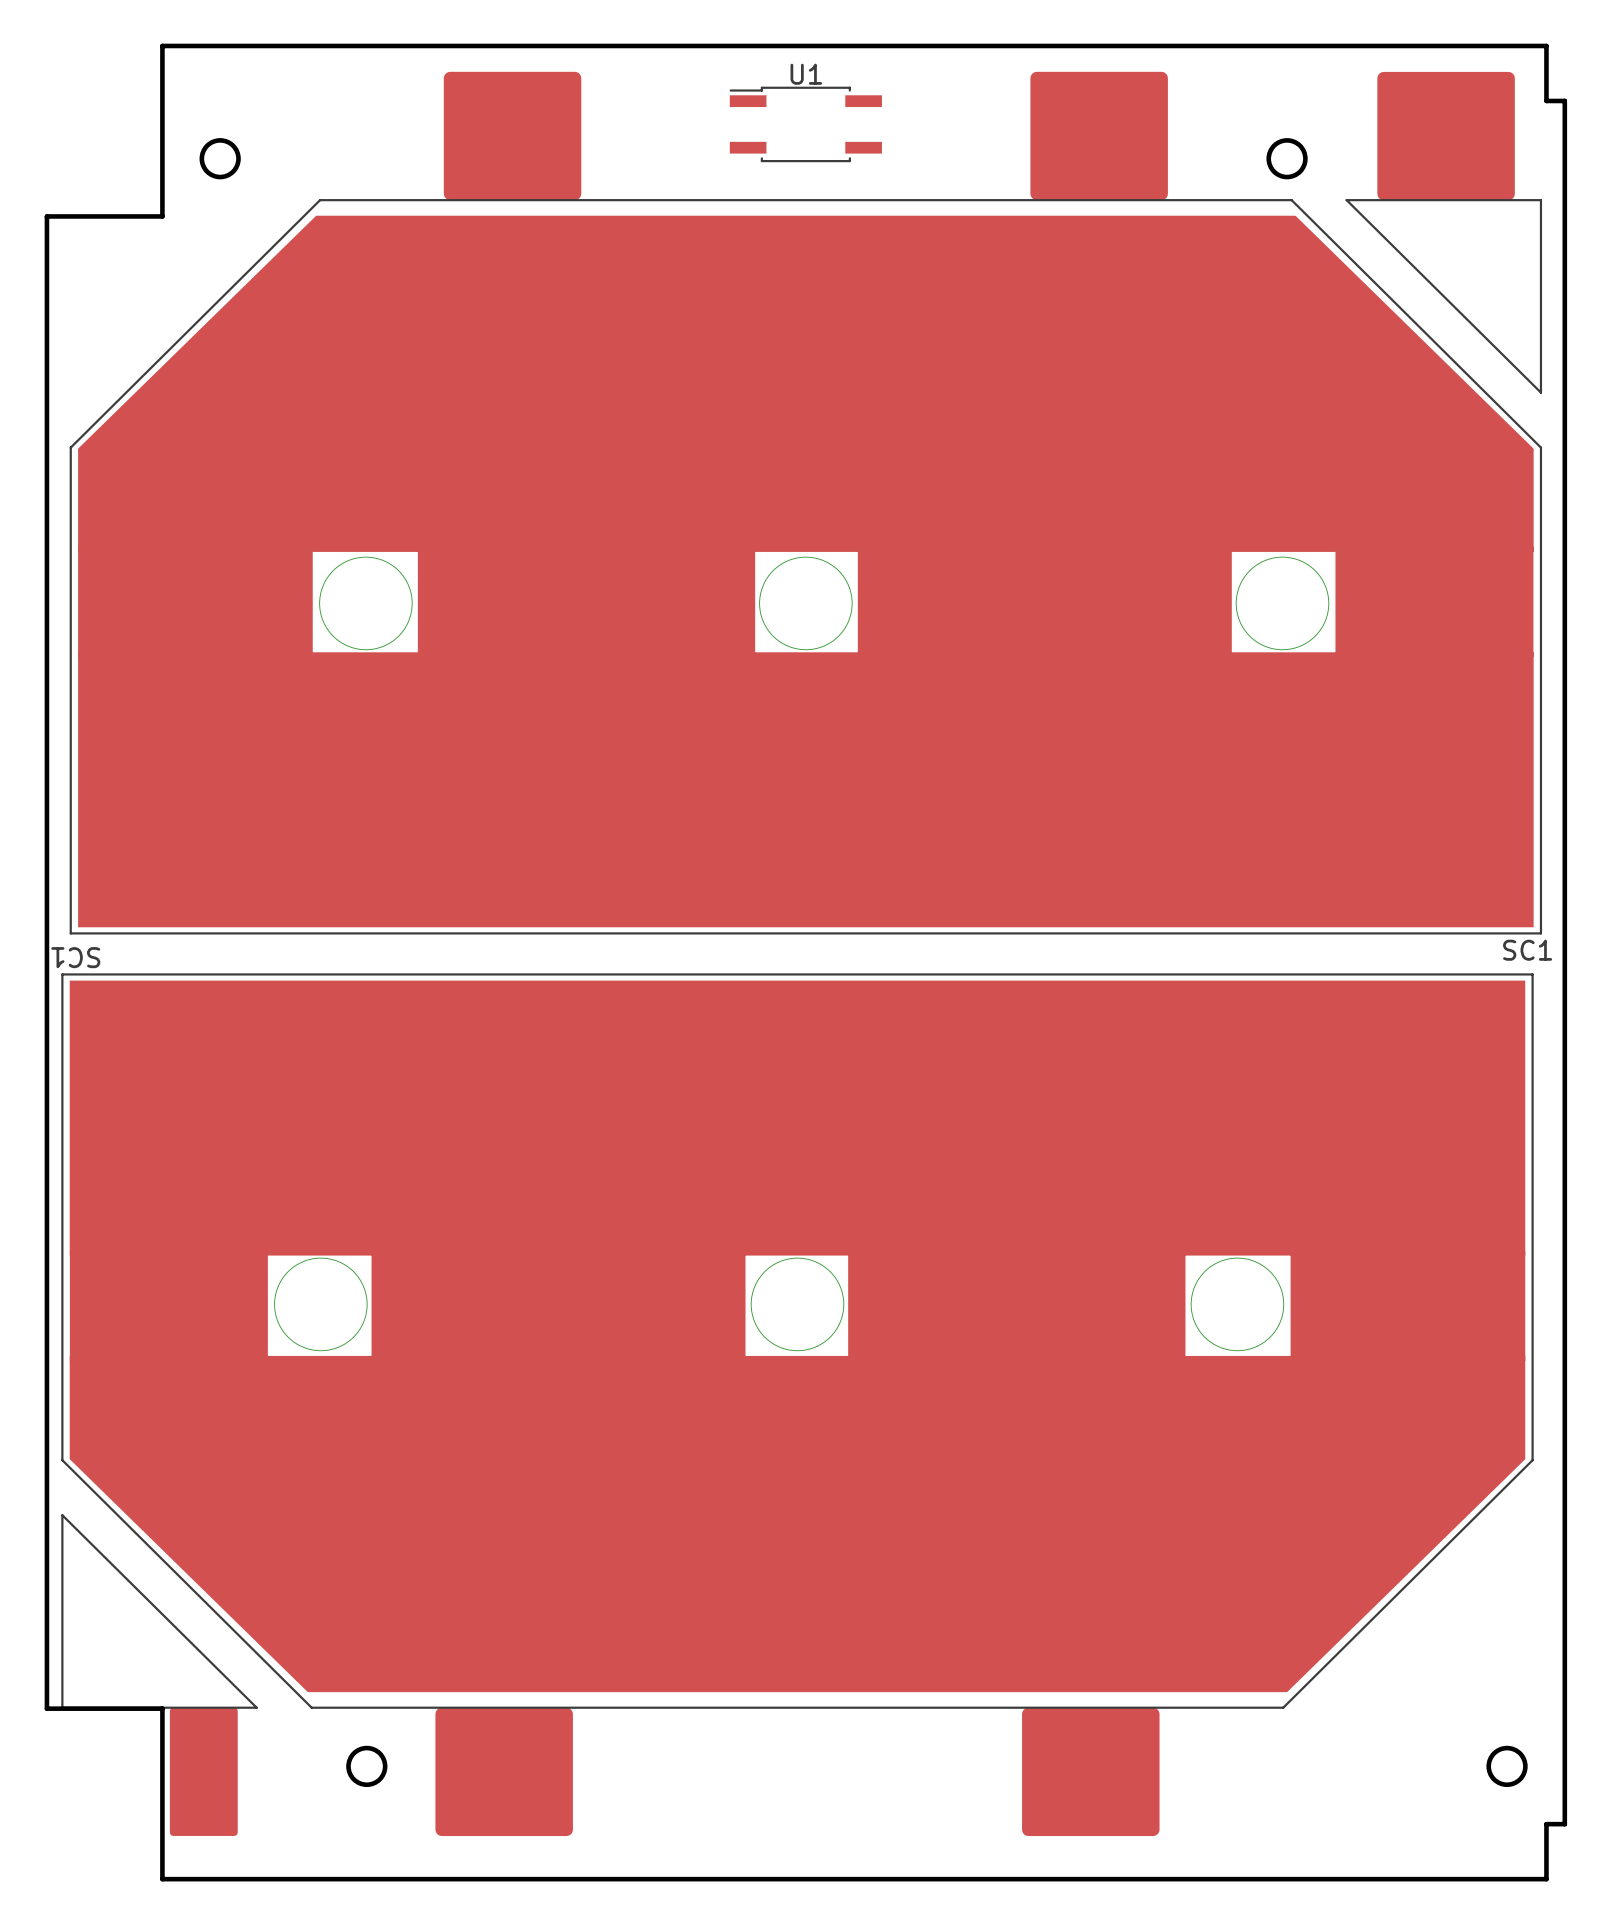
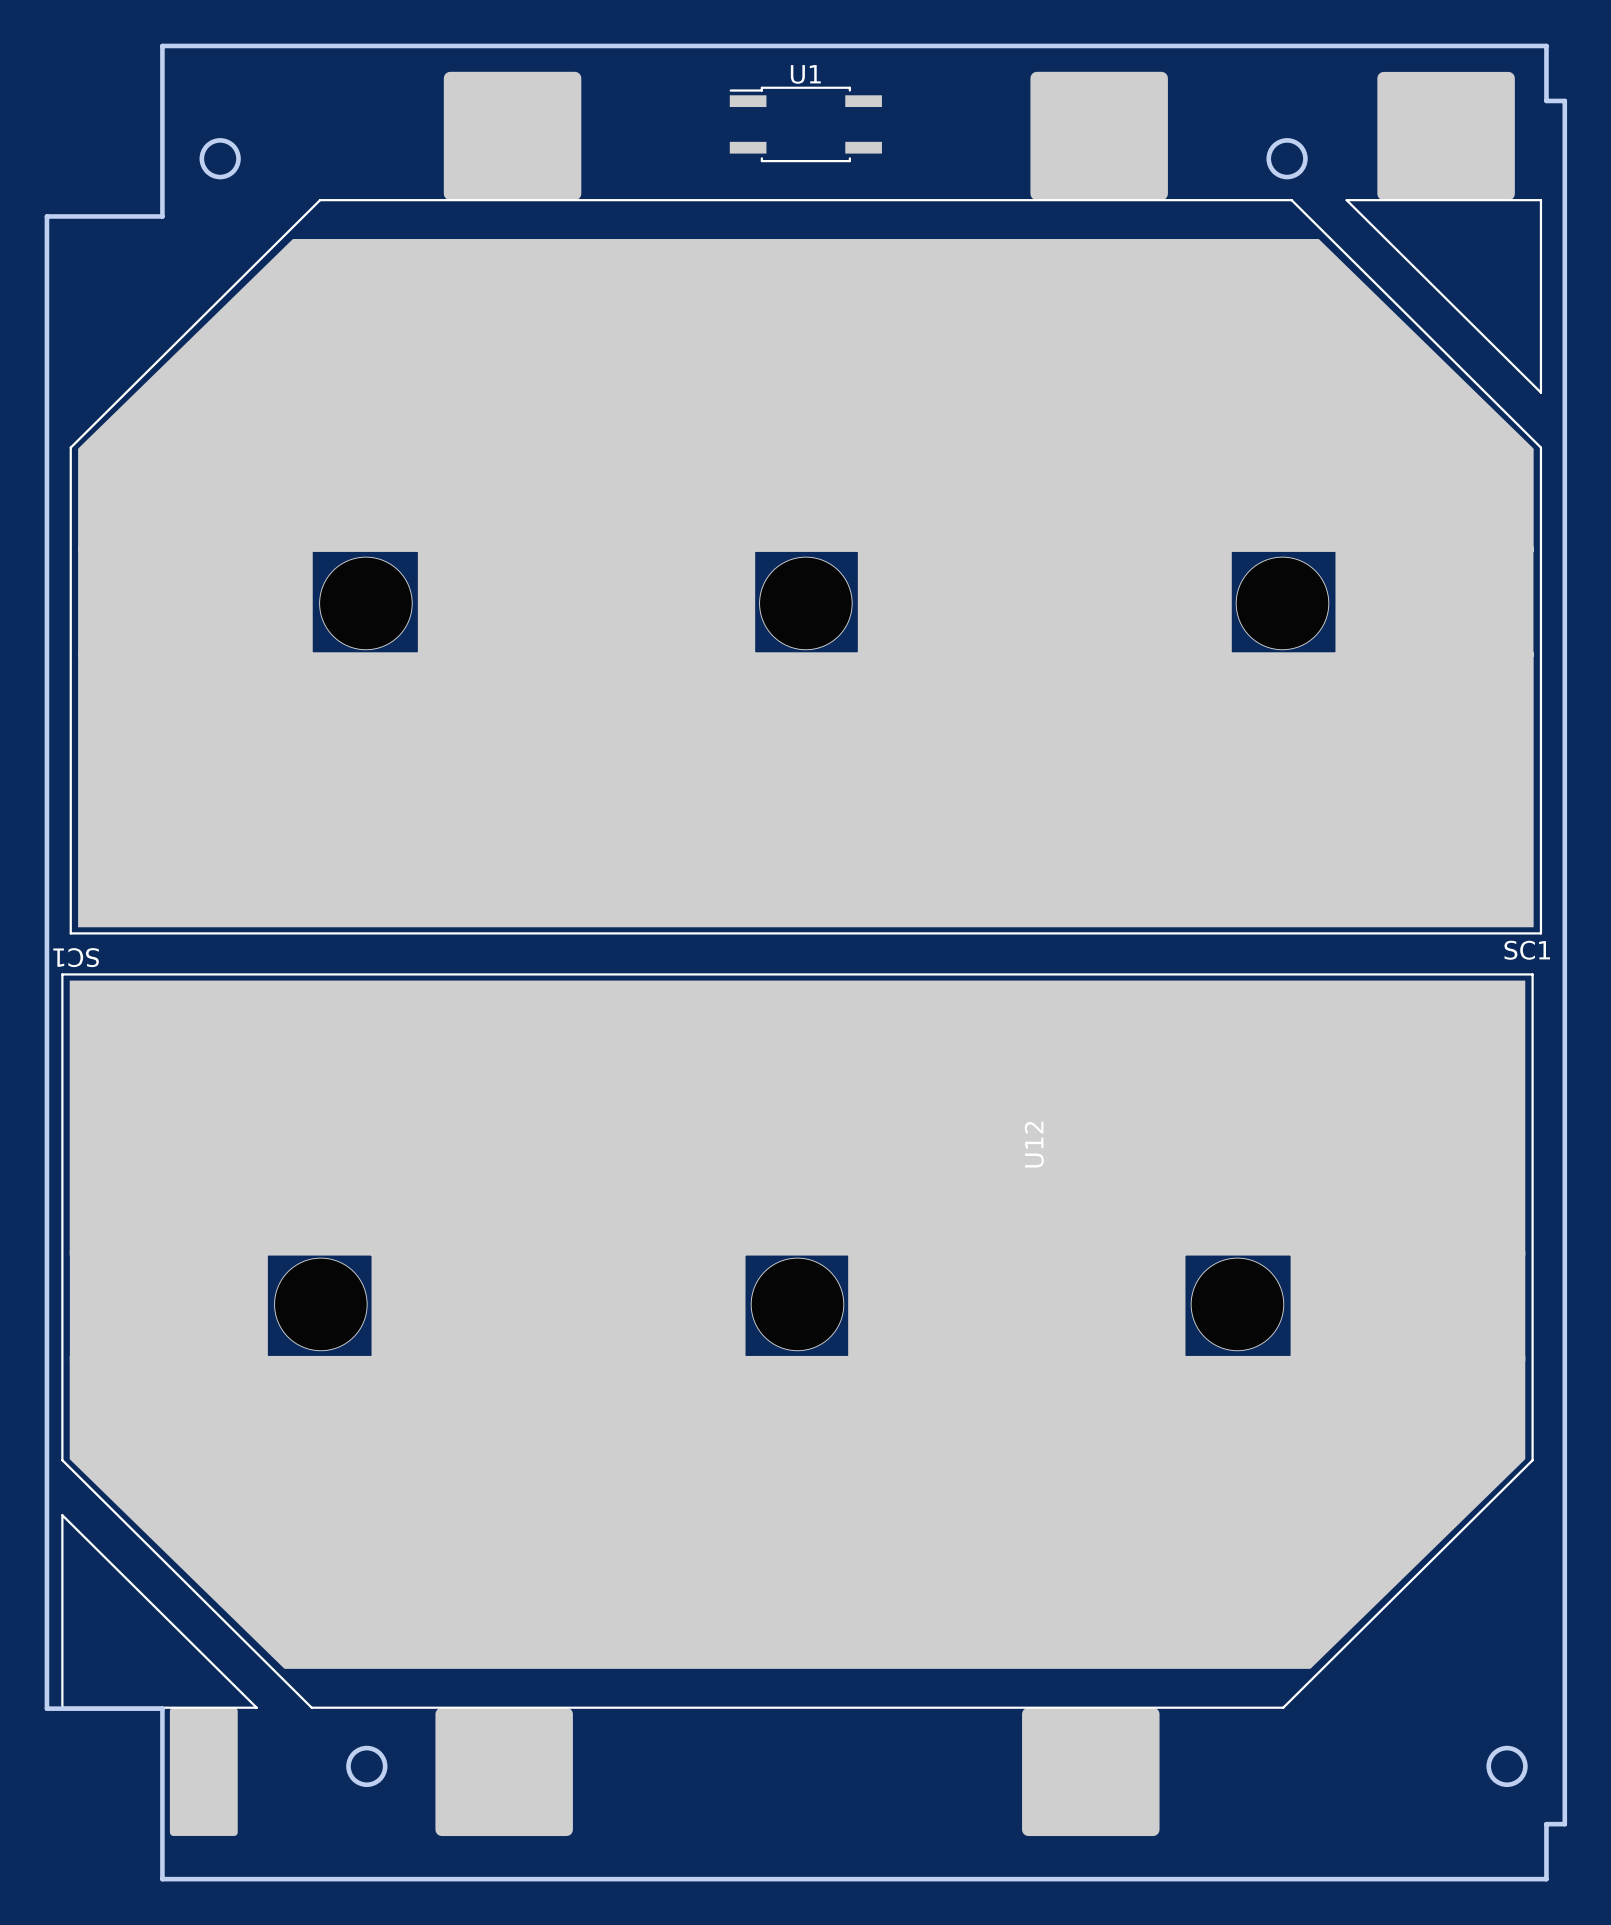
SC1 footprint: [69, 71, 1543, 935] -> [69, 71, 1543, 935]
SC1 footprint: [61, 973, 1534, 1837] -> [61, 973, 1534, 1837]
part: none -> (1034, 1144)

